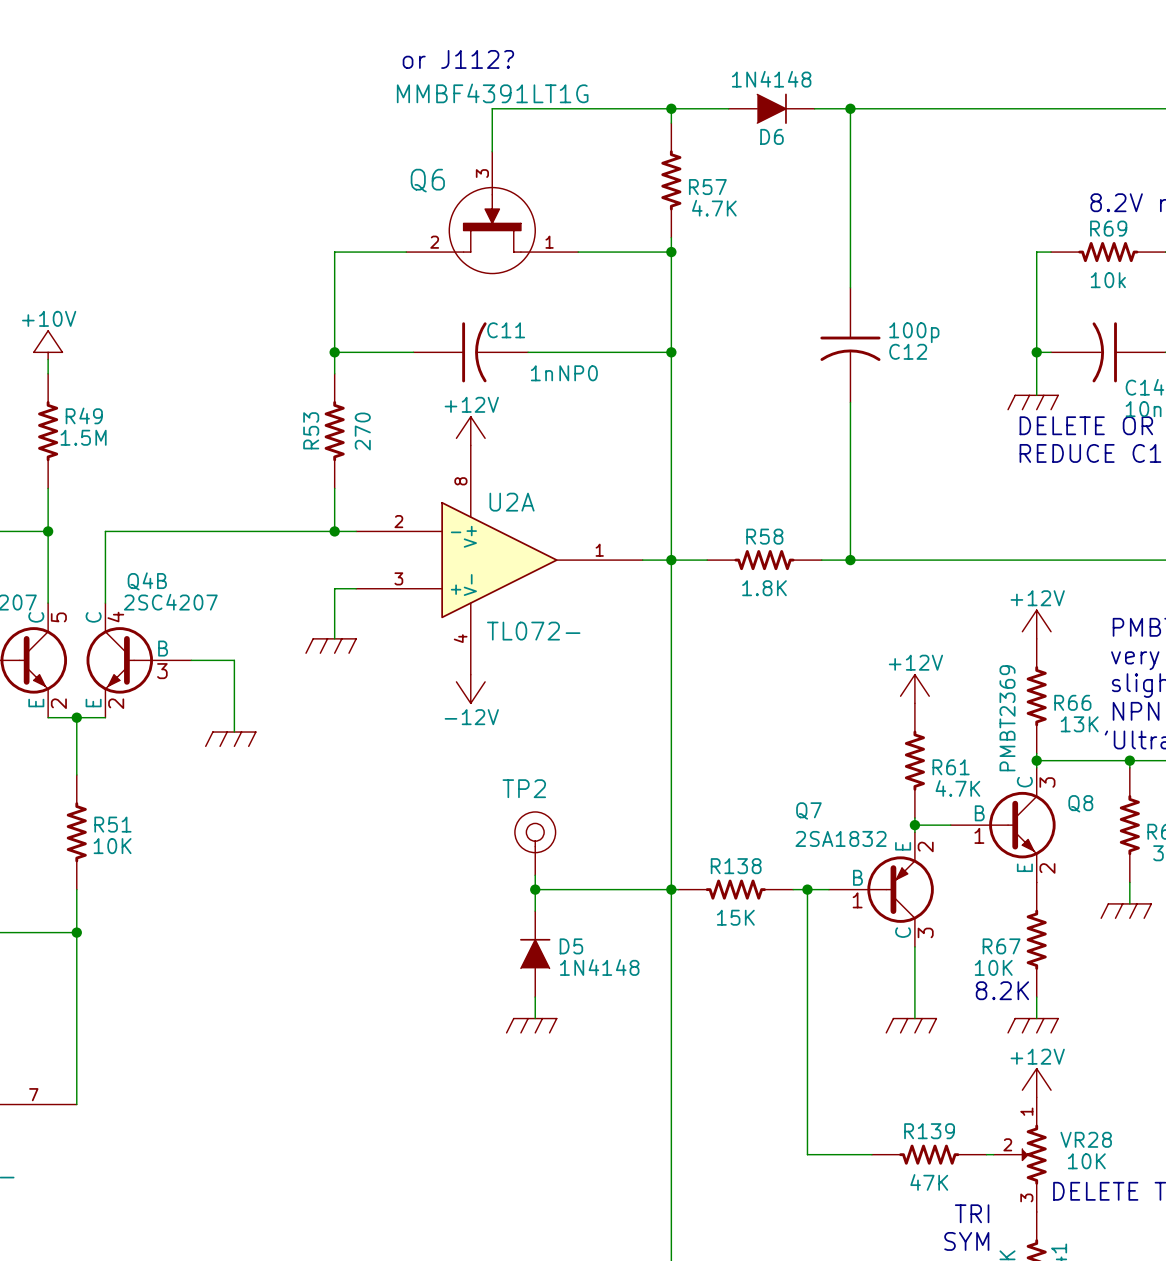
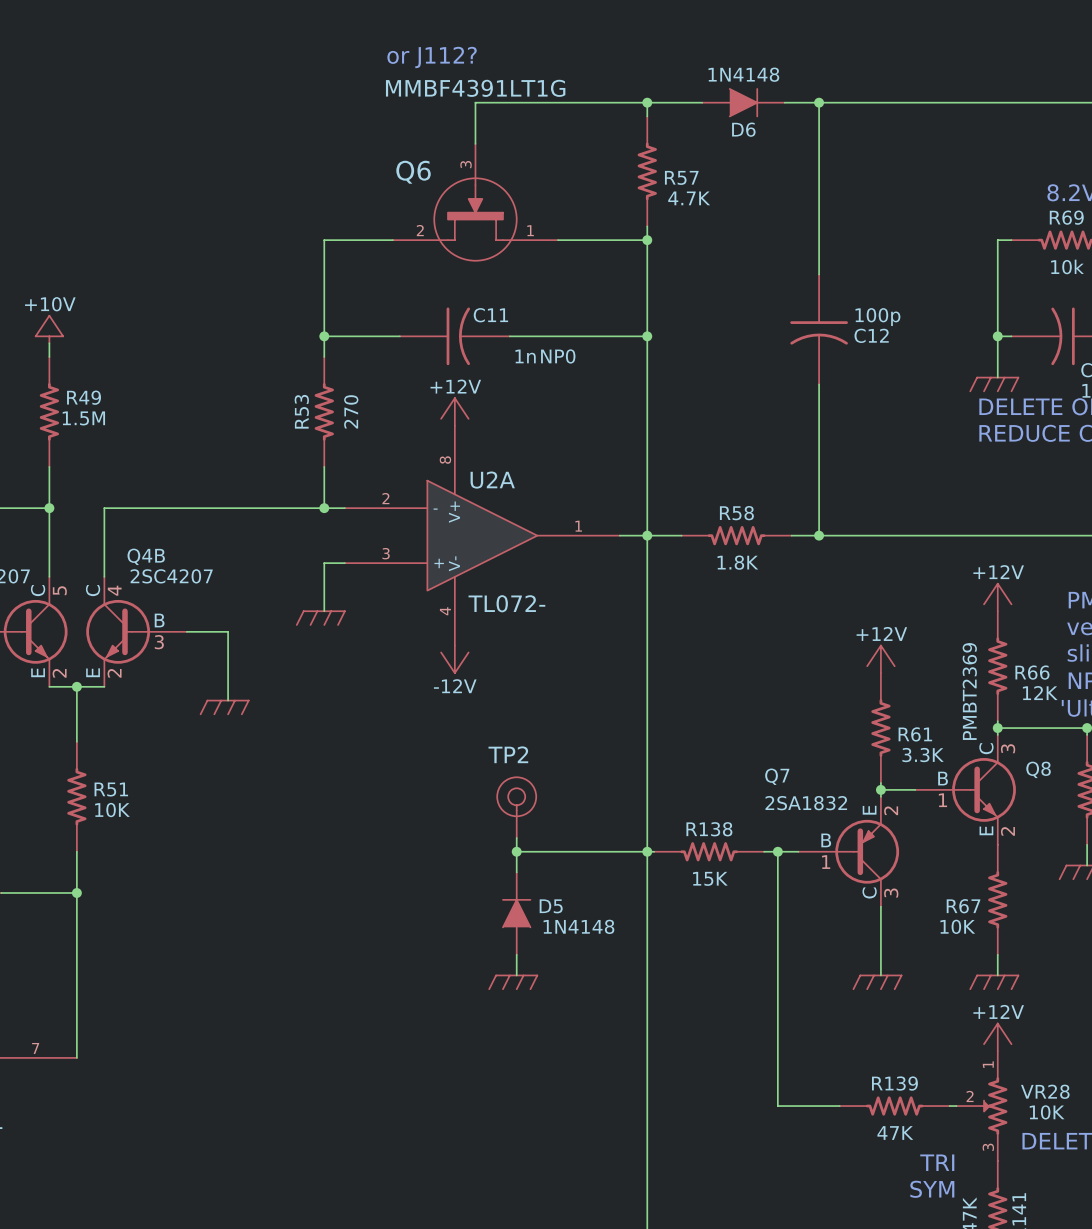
R66 value: 13K (1079, 724) -> 12K (1040, 693)
R61 value: 4.7K (957, 788) -> 3.3K (923, 755)
text: 8.2K (1002, 990) -> none

